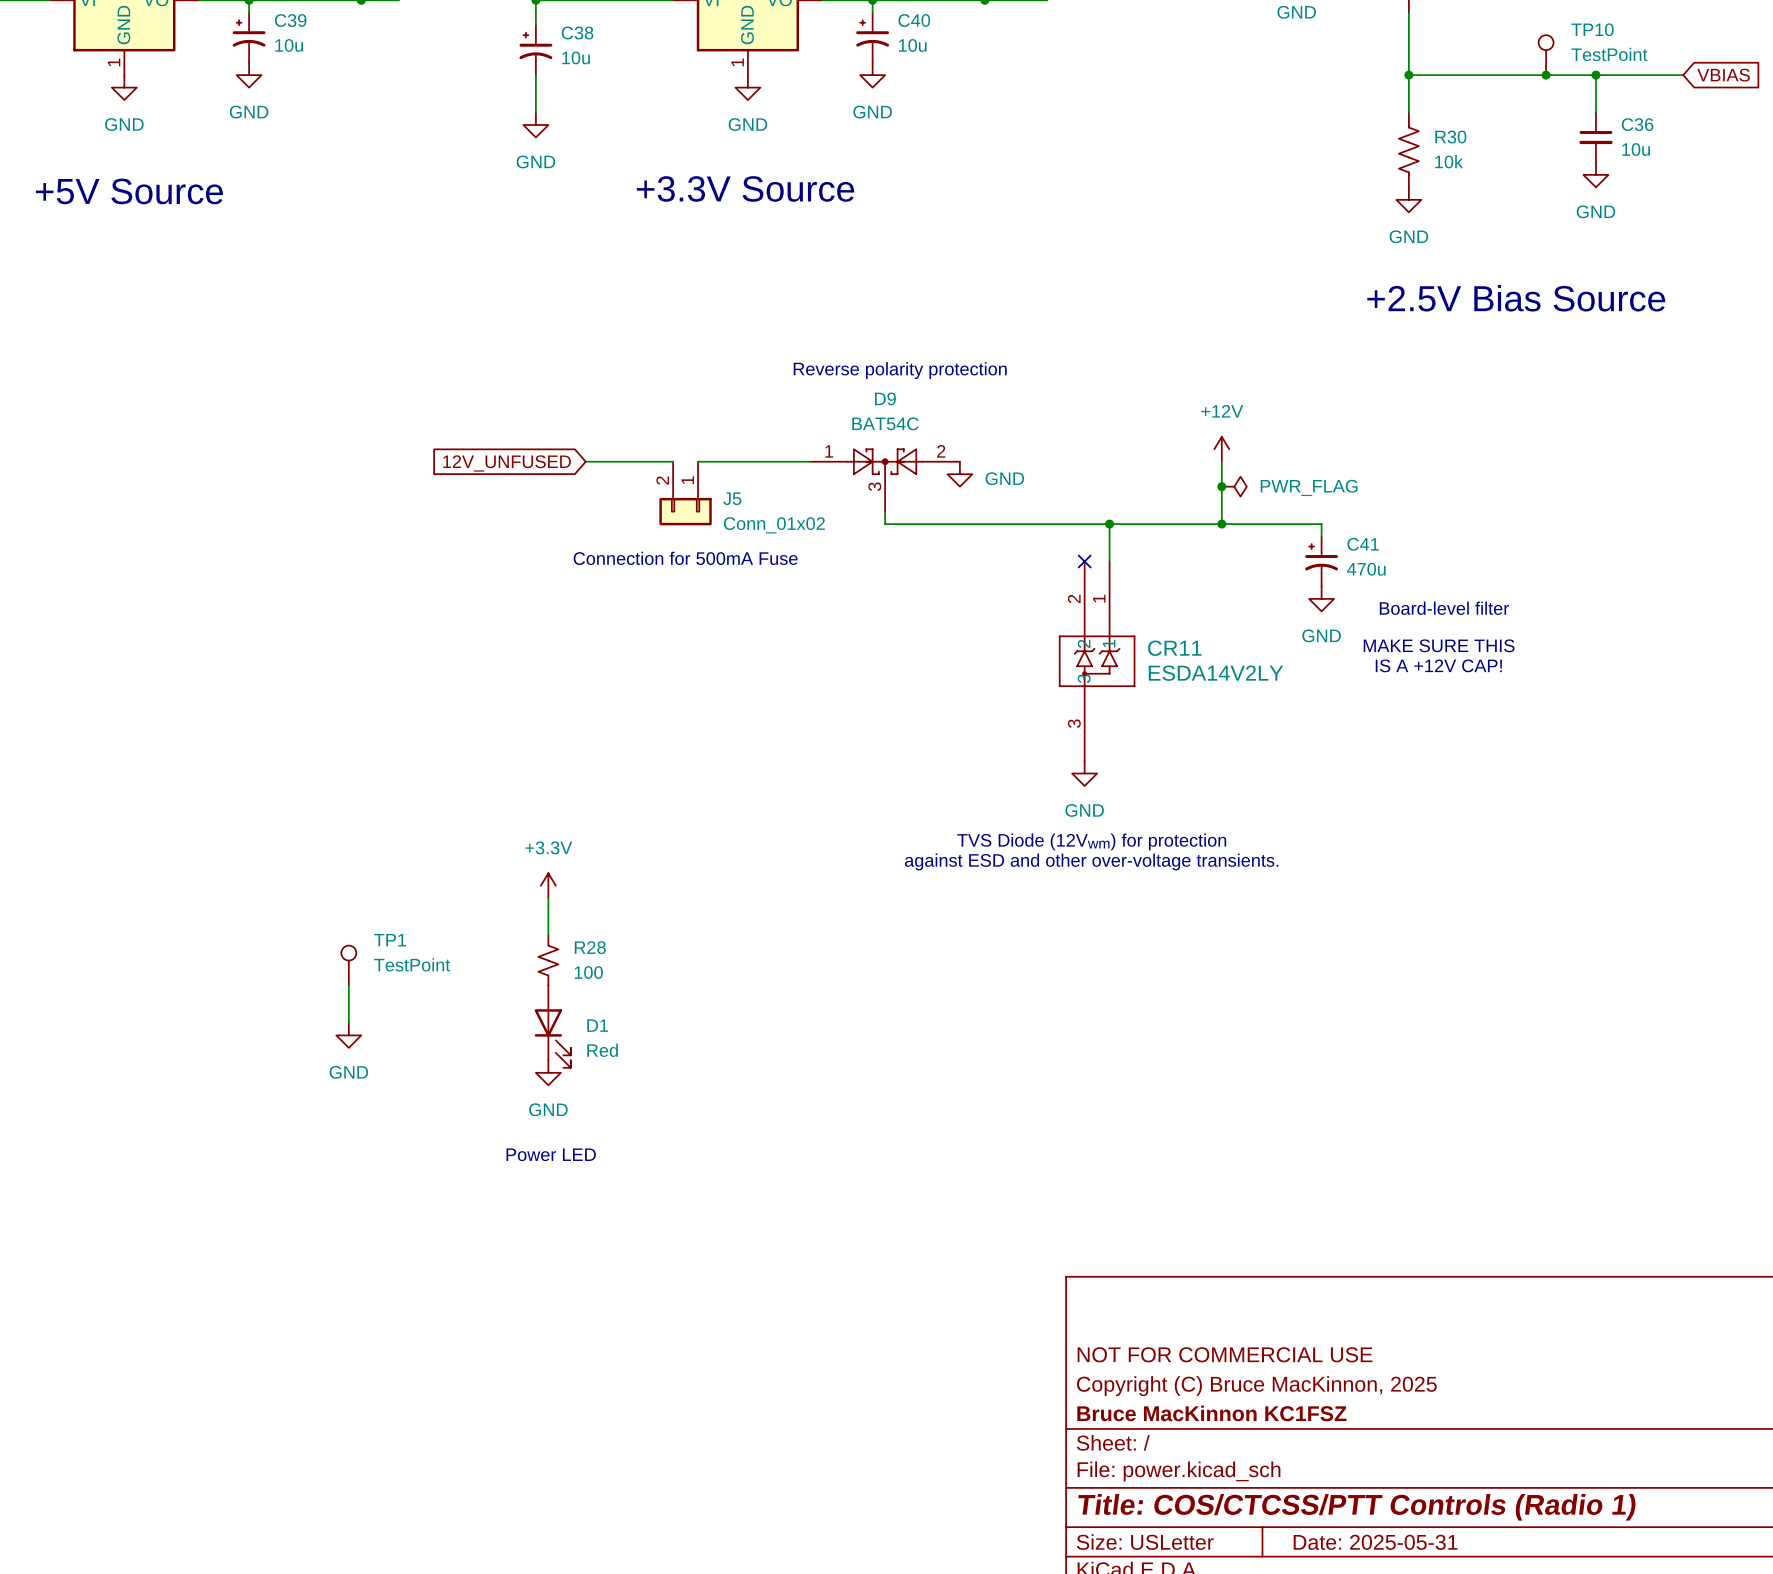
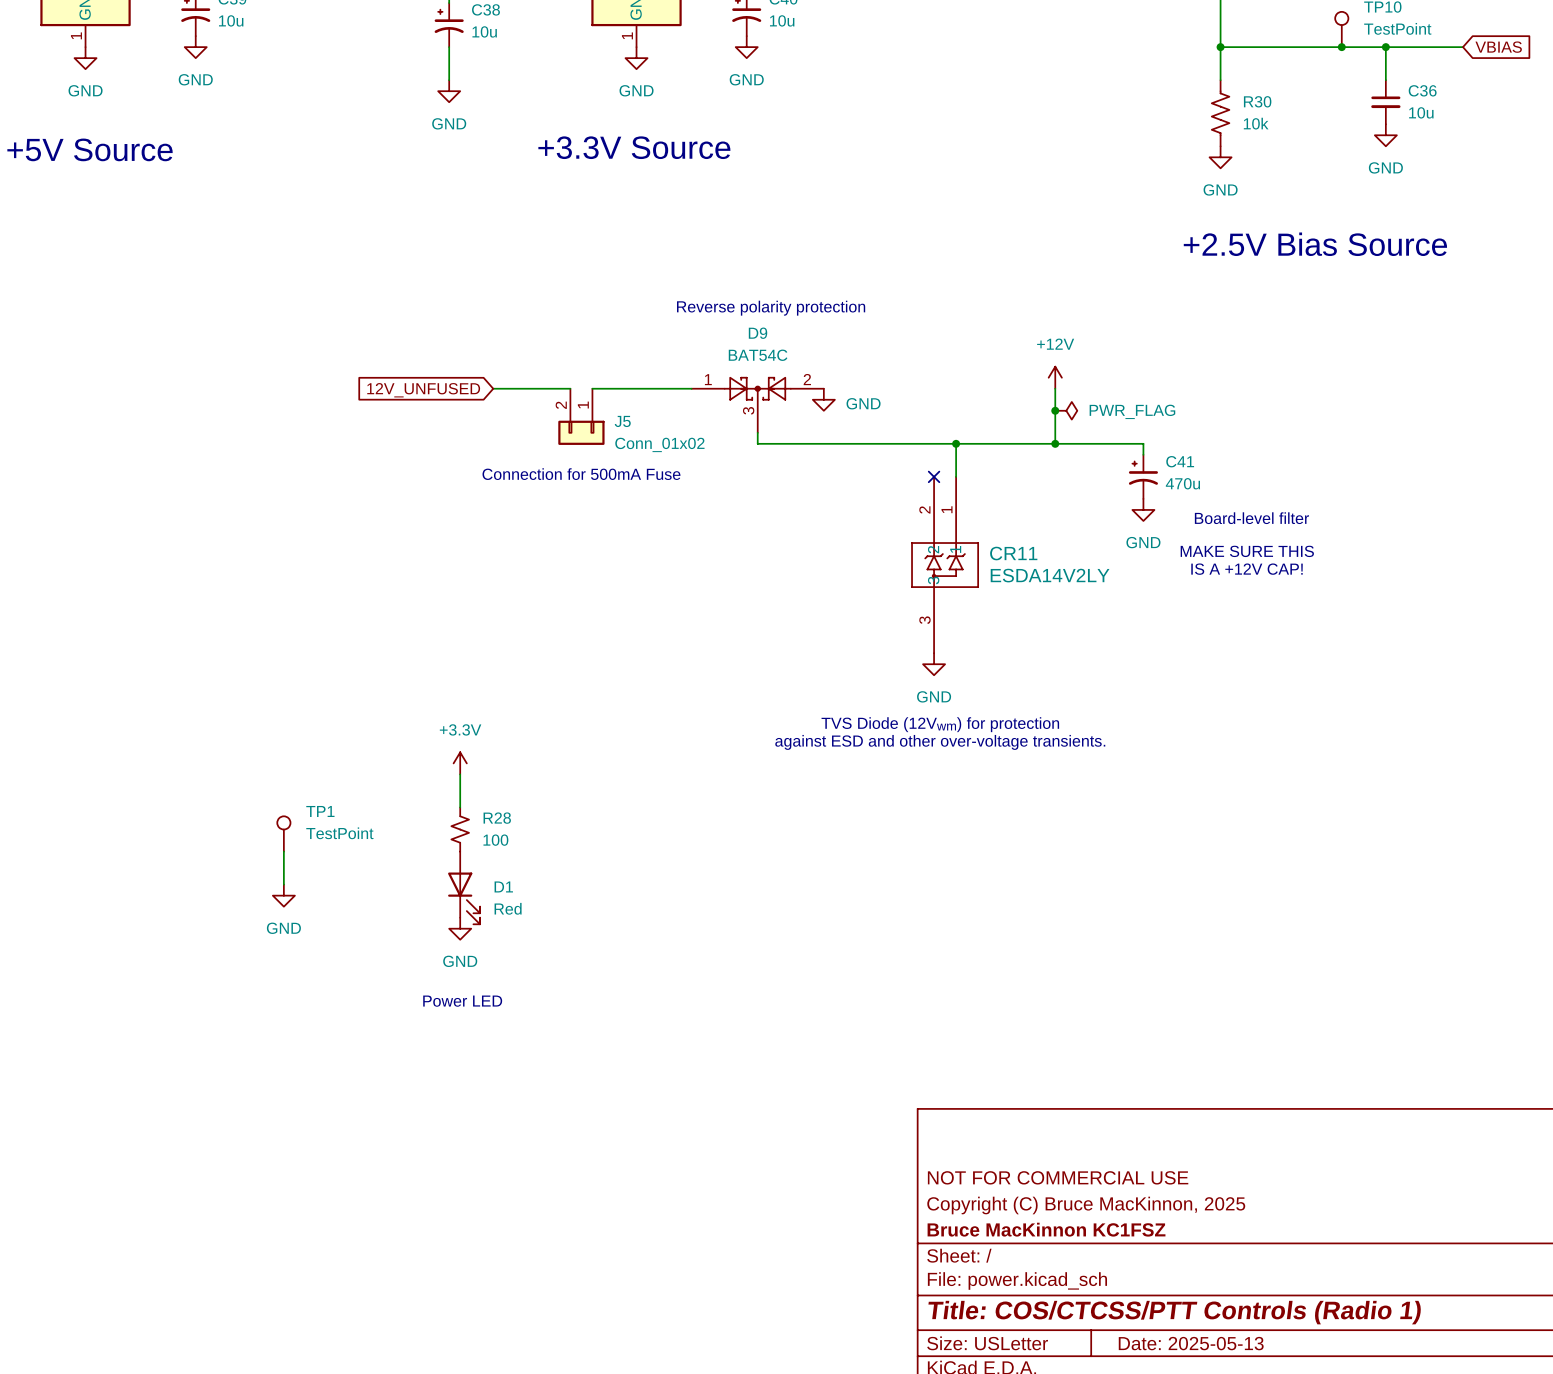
title block: Date: 2025-05-31 (1375, 1542) -> Date: 2025-05-13 (1191, 1343)

